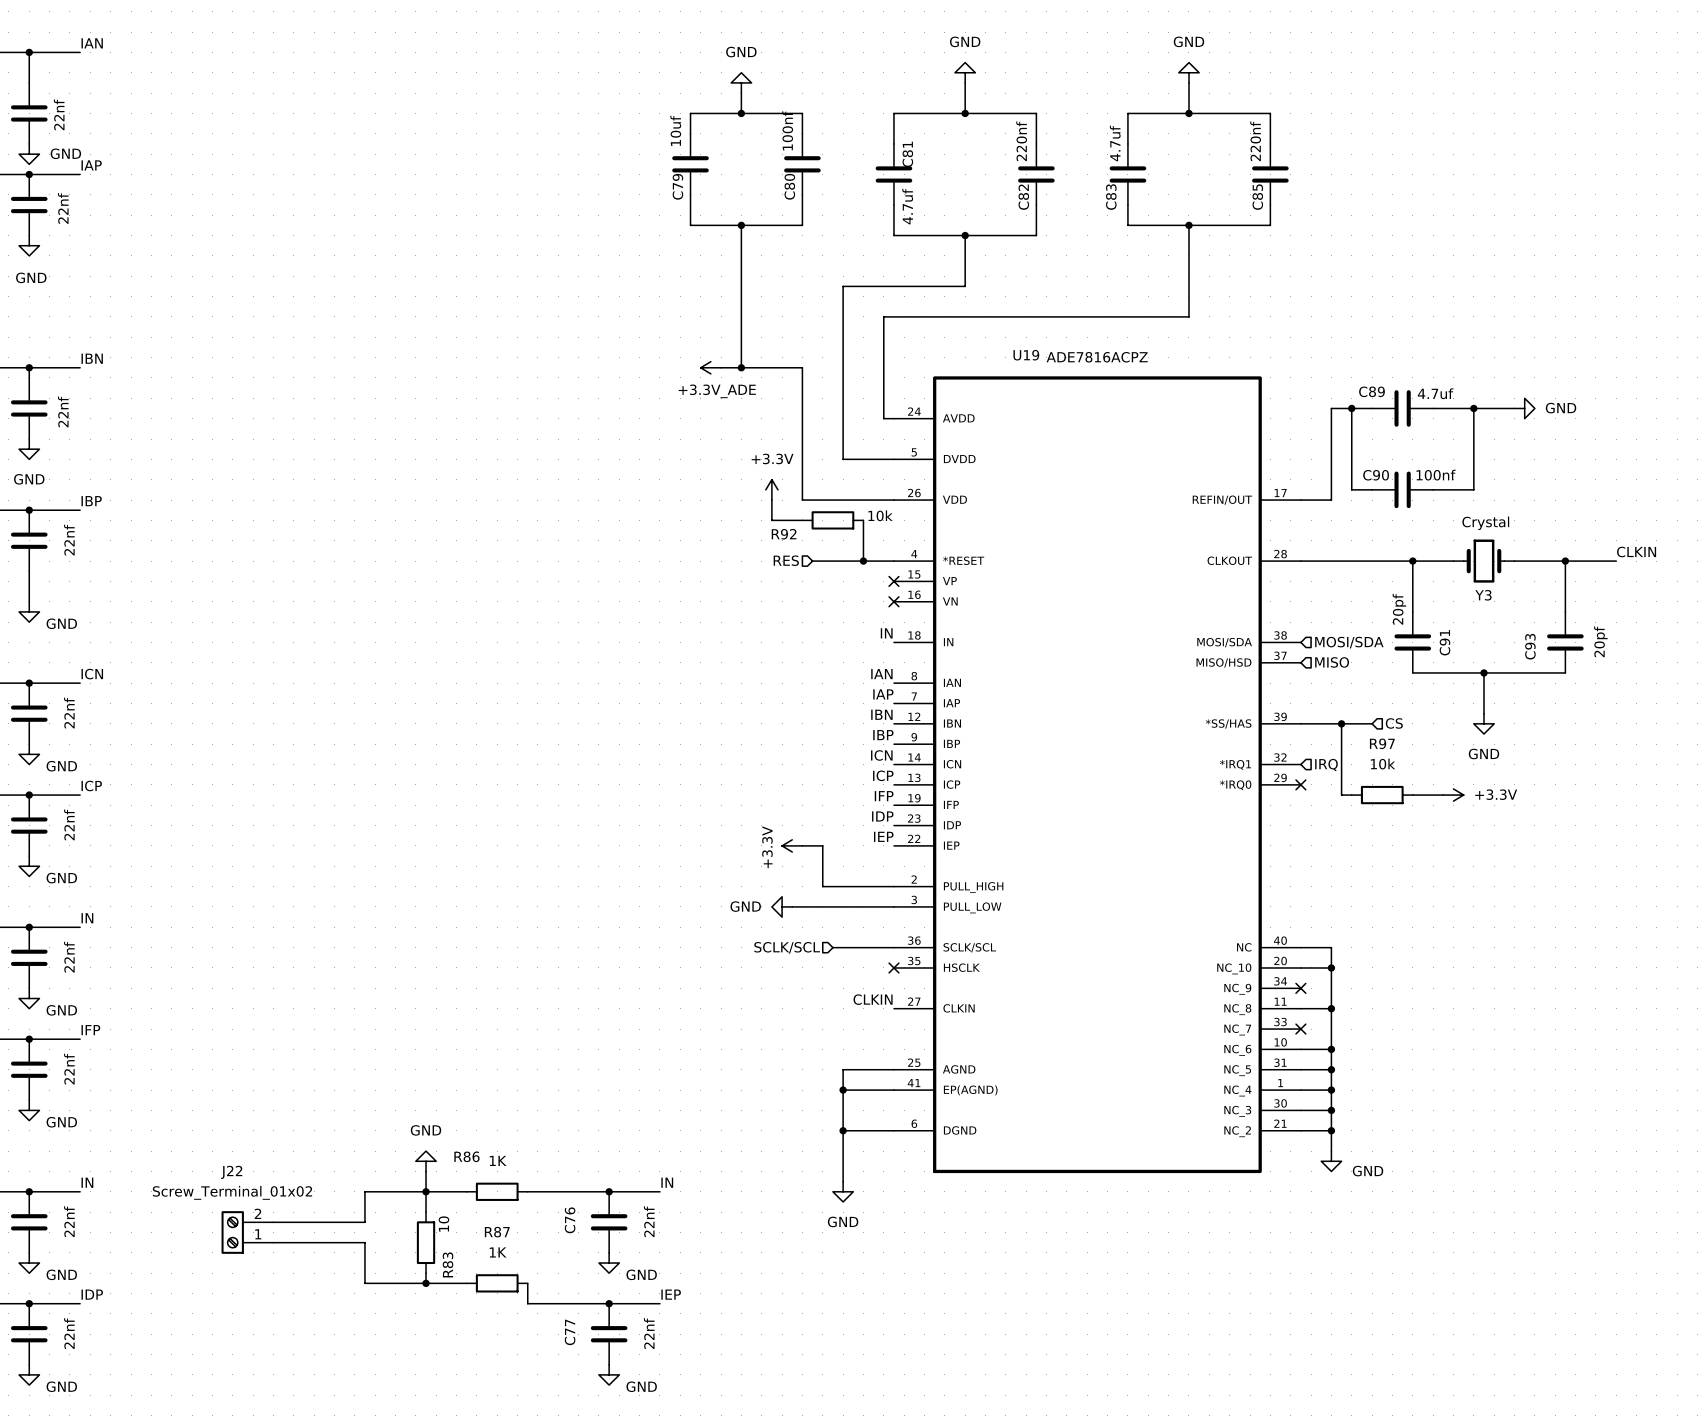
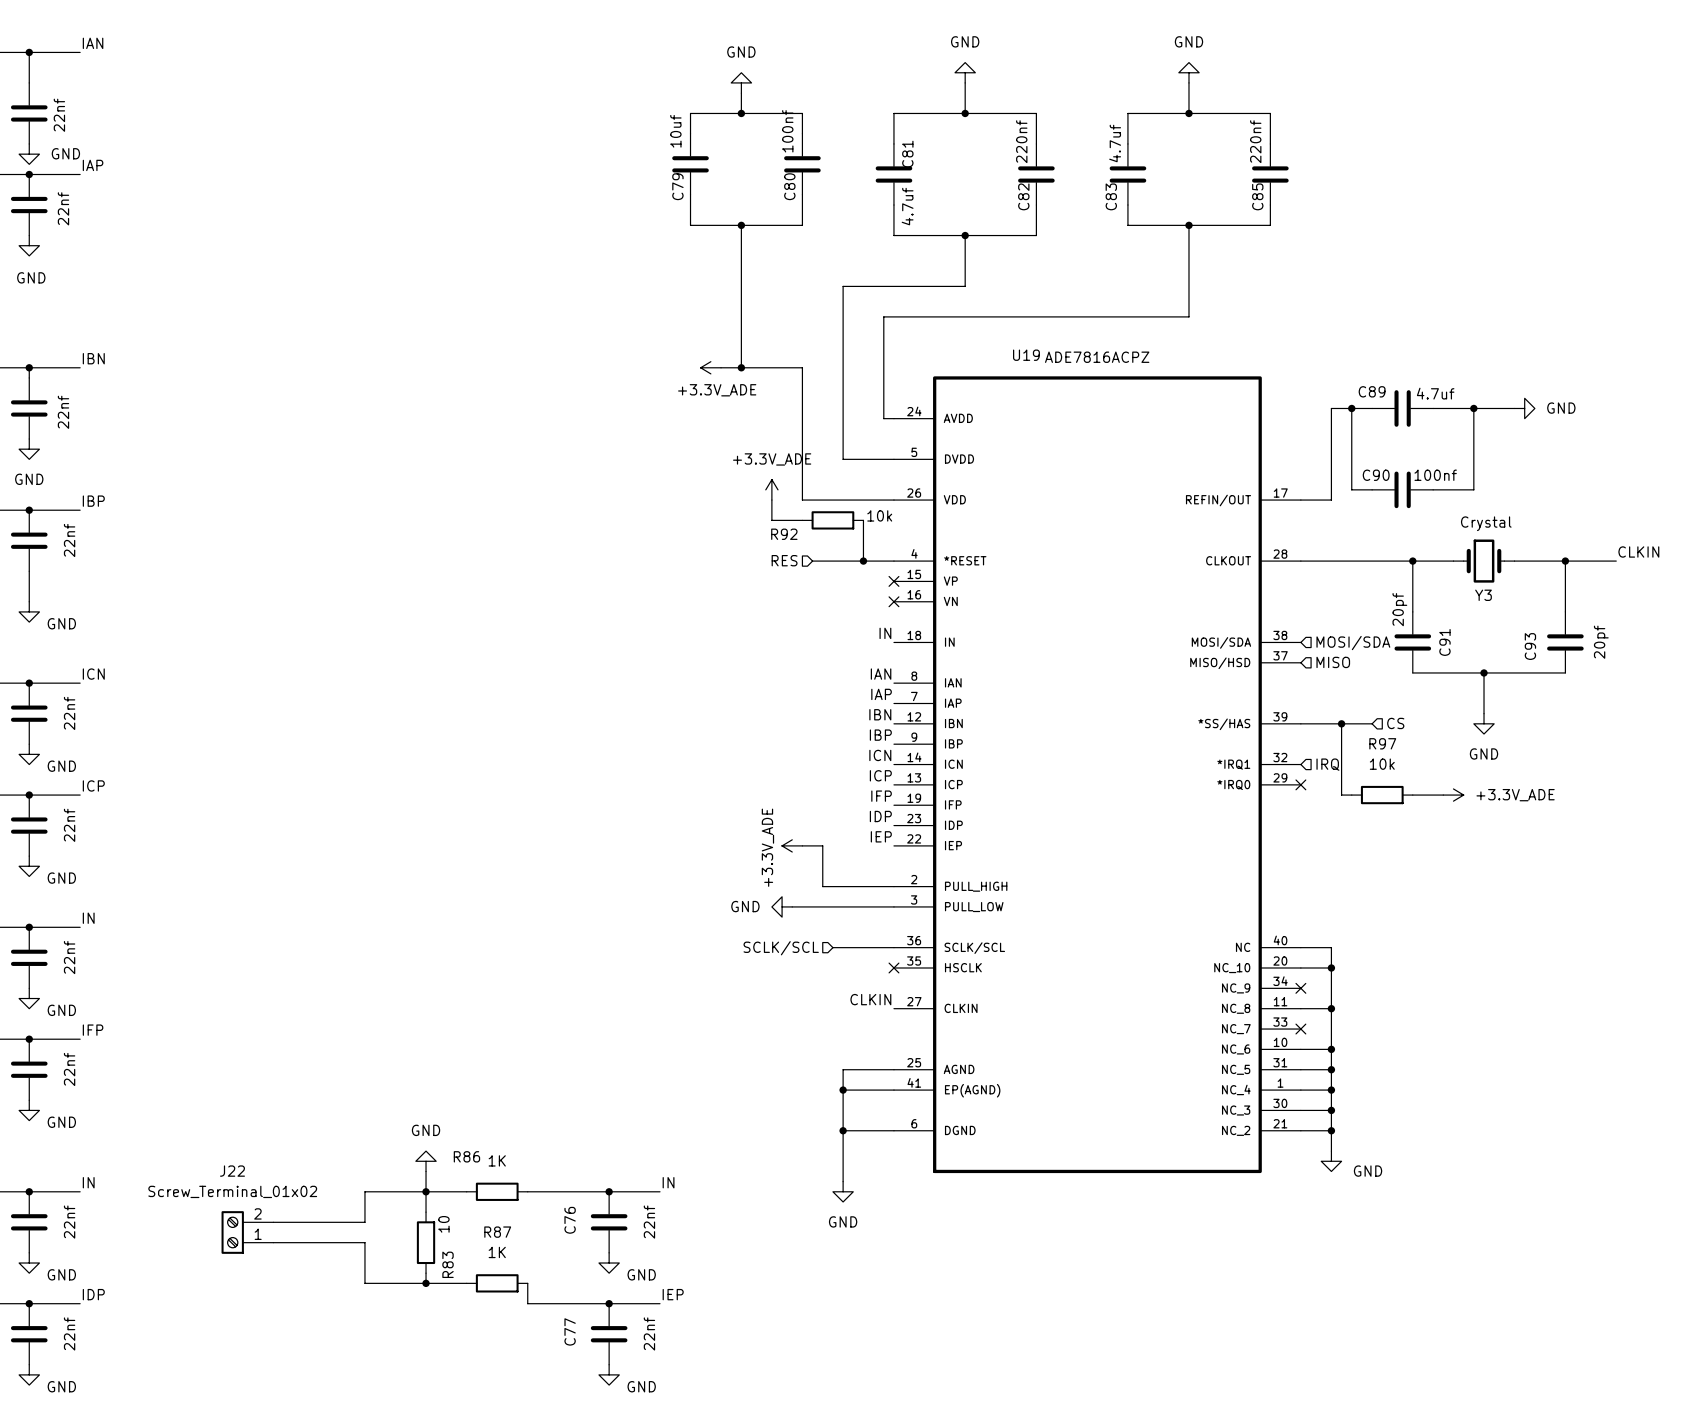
power symbol: +3.3V (771, 489) -> +3.3V_ADE (771, 489)
power symbol: +3.3V (1453, 795) -> +3.3V_ADE (1453, 795)
power symbol: +3.3V (792, 845) -> +3.3V_ADE (792, 845)

